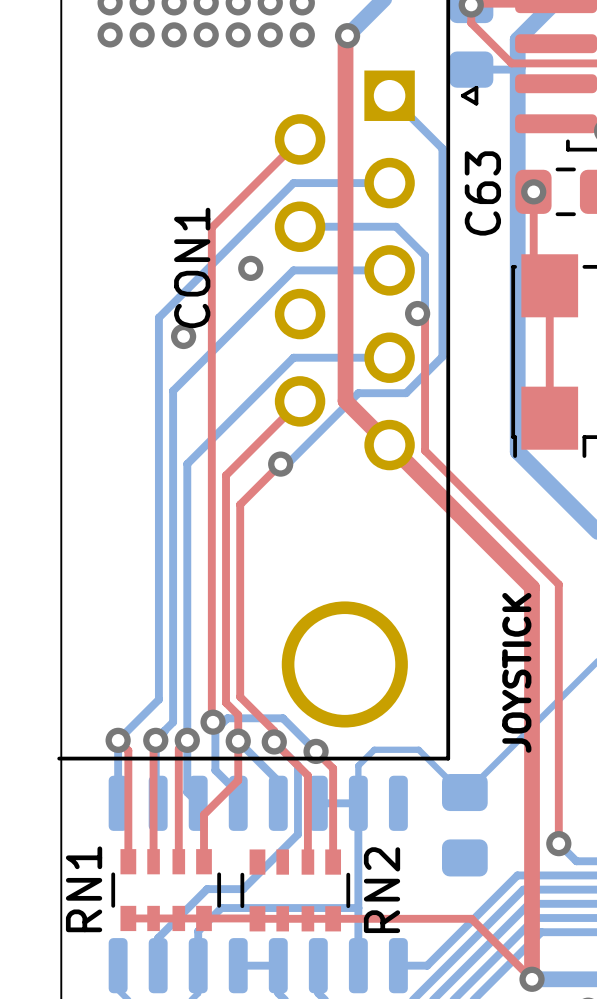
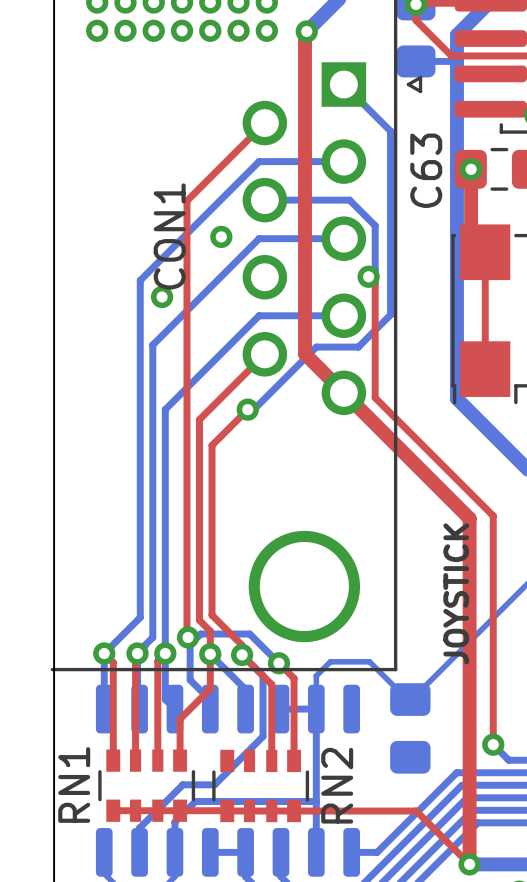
top track width: thin (533, 191) (533, 269) -> thick (471, 169) (471, 238)

